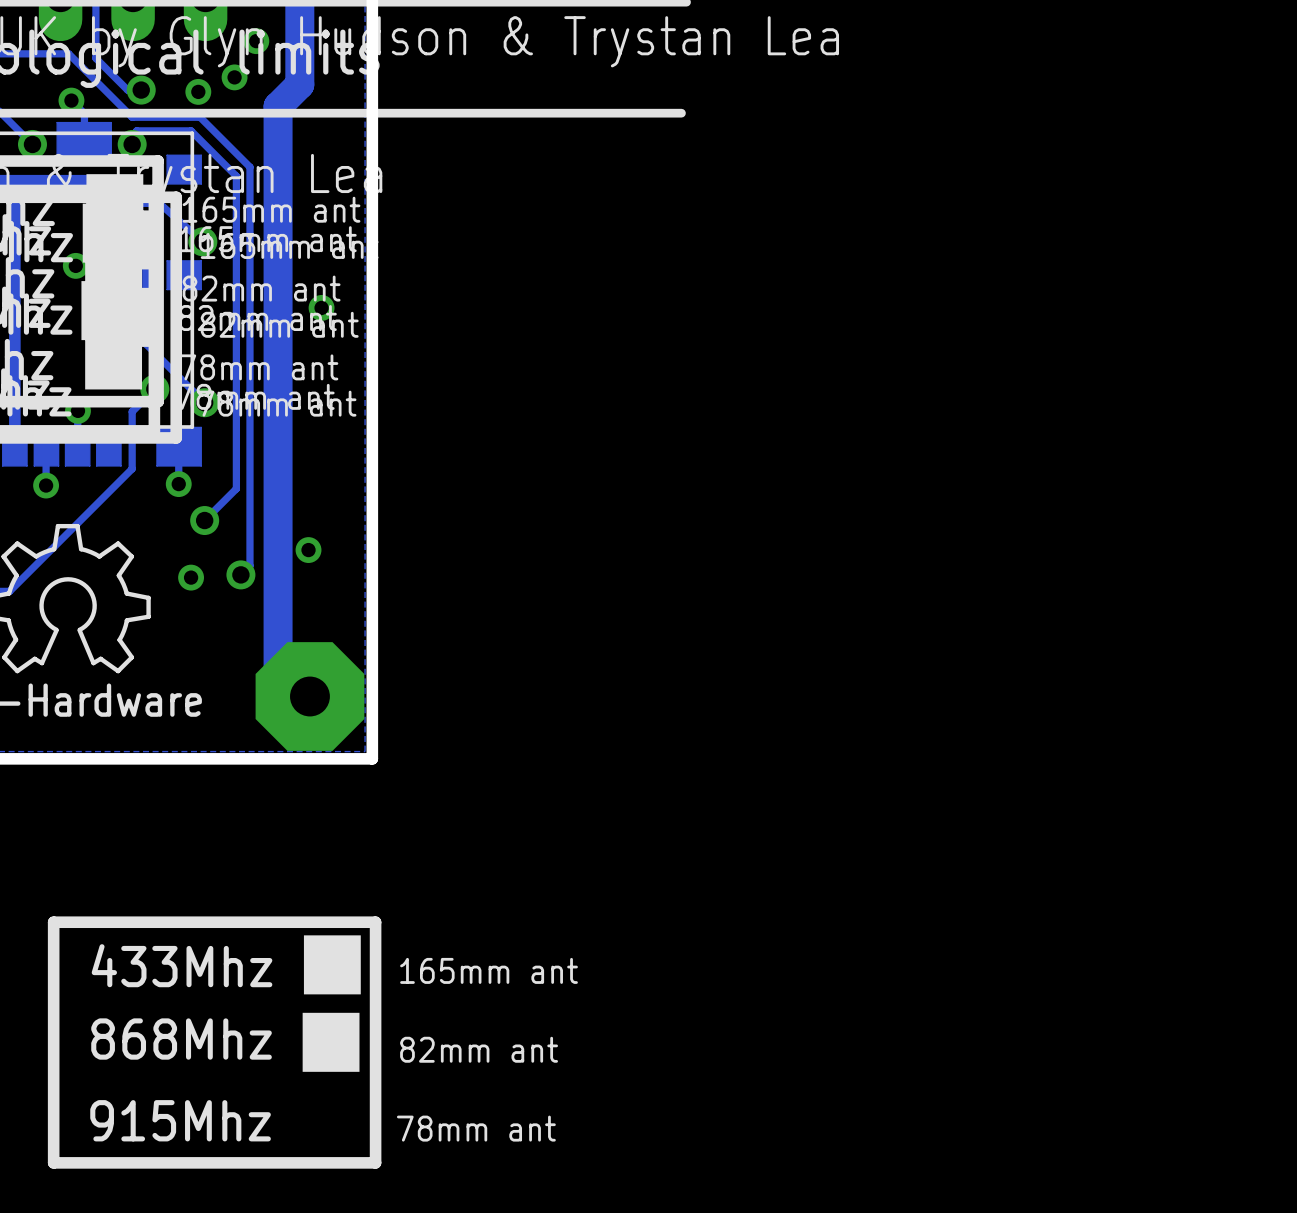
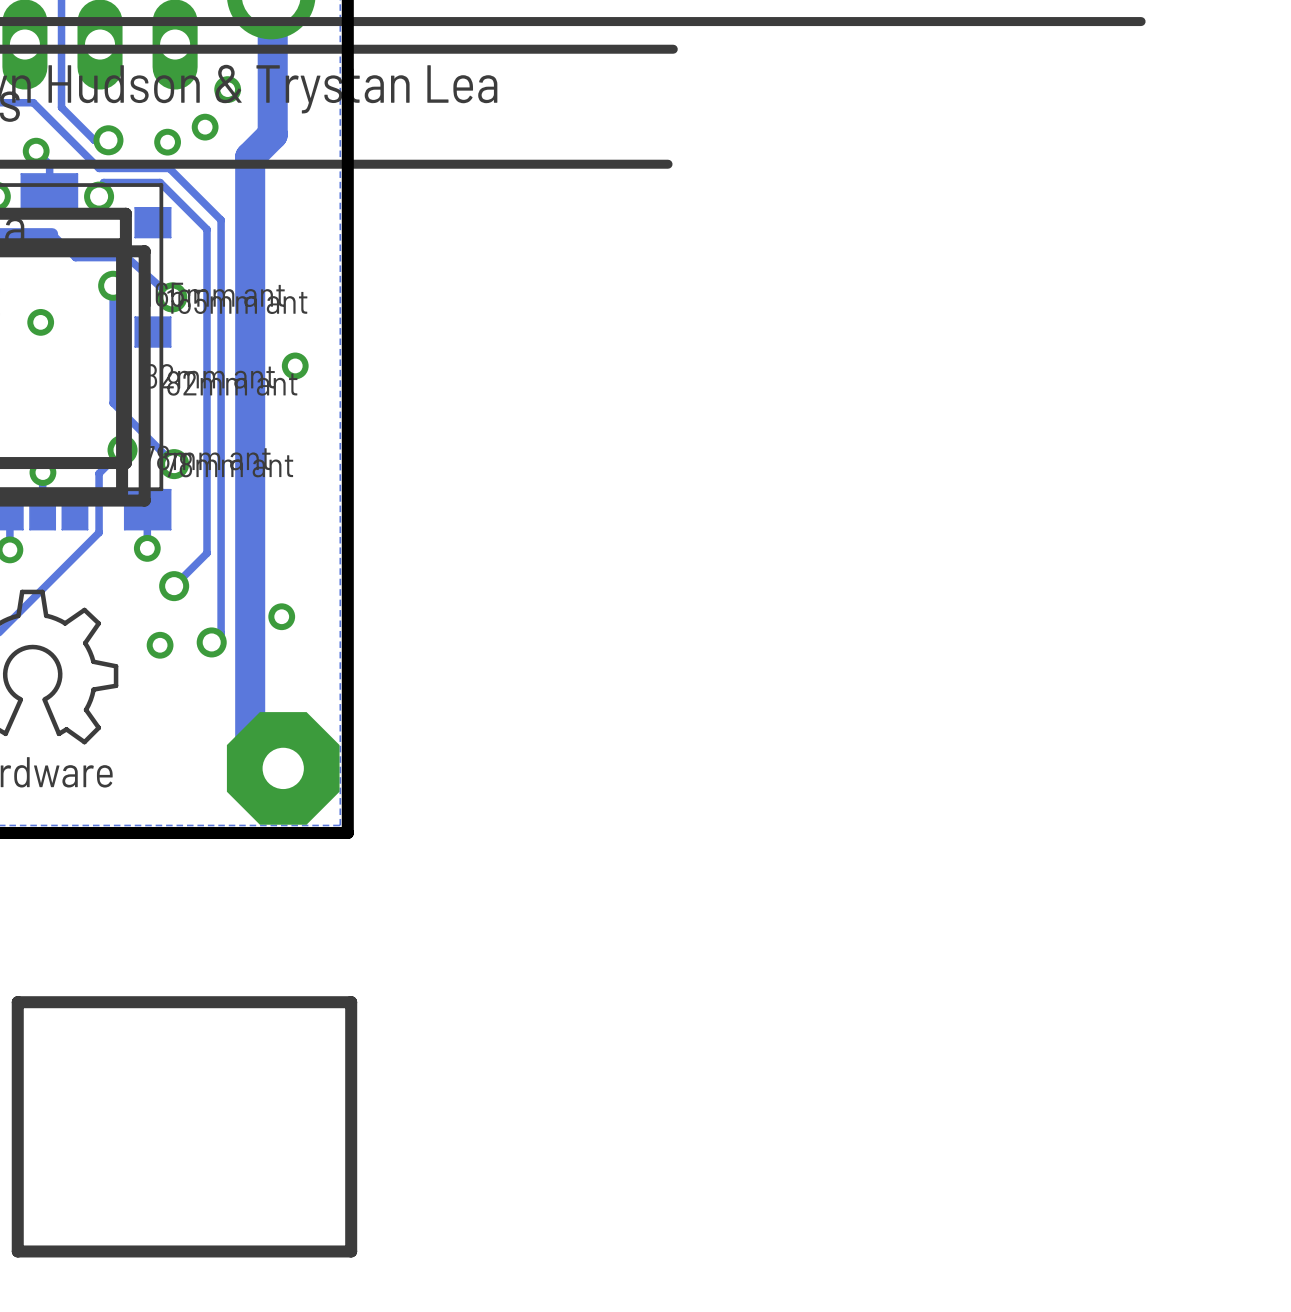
drawing: [81, 174, 162, 390] -> none
text: 165mm ant (271, 209) -> none
text: 82mm ant (261, 288) -> none
text: 78mm ant (258, 367) -> none
drawing: [302, 935, 361, 1072] -> none
text: 433Mhz (182, 965) -> none
text: 165mm ant (489, 970) -> none
text: 868Mhz (181, 1039) -> none
text: 82mm ant (479, 1049) -> none
text: 915Mhz (180, 1120) -> none
text: 78mm ant (476, 1128) -> none

